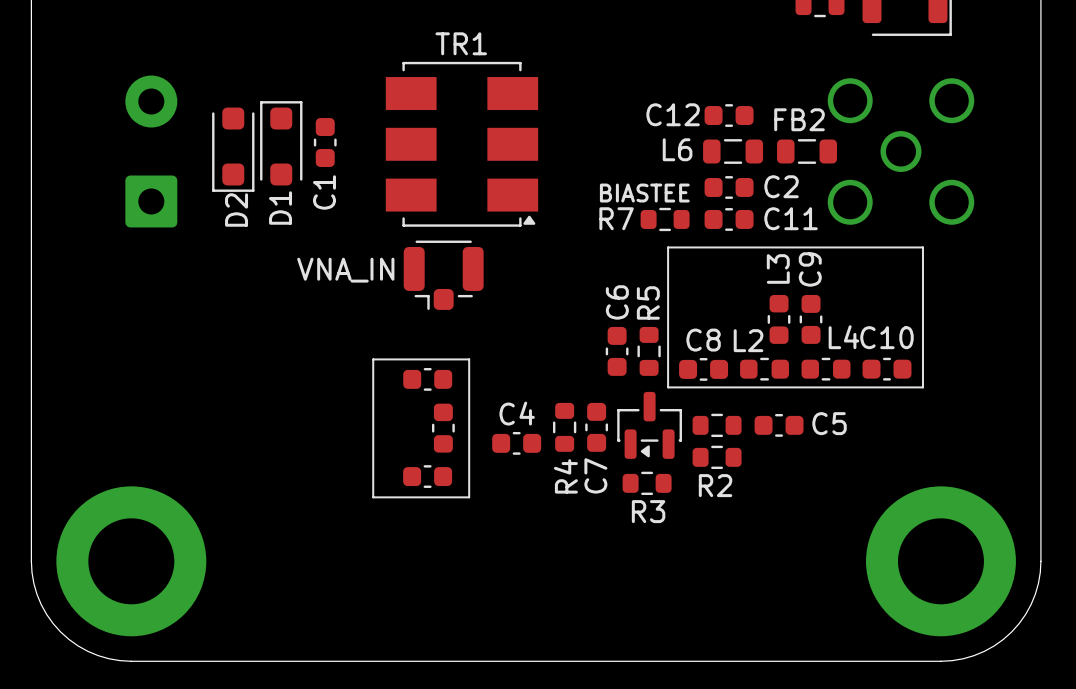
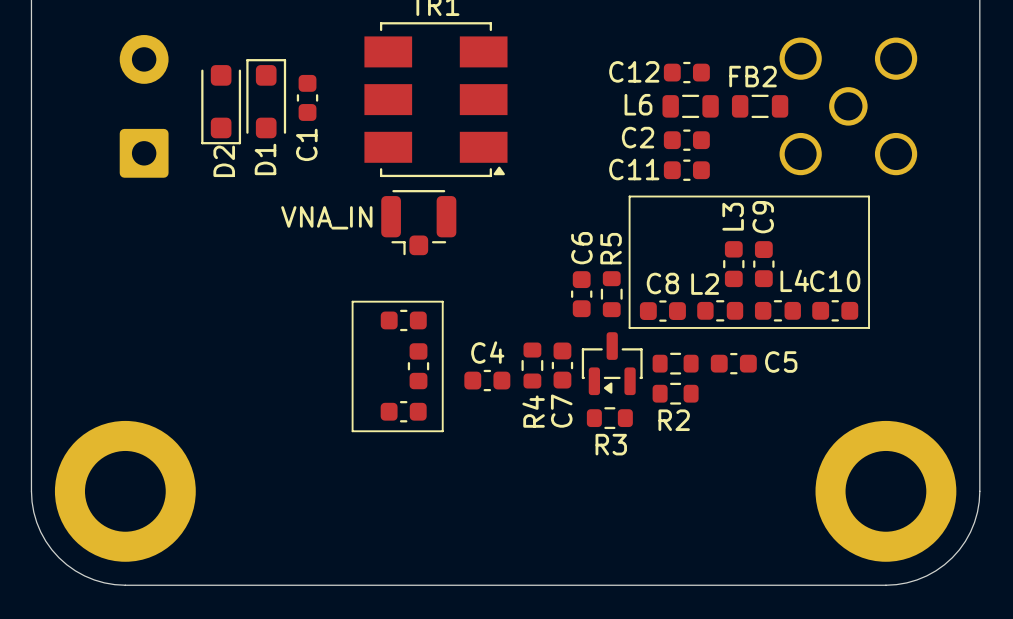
C2 name position: C2 (781, 186) -> C2 (638, 137)
text: BIASTEE (644, 193) -> none
C11 name position: C11 (791, 218) -> C11 (634, 169)
R7: (665, 219) -> none

